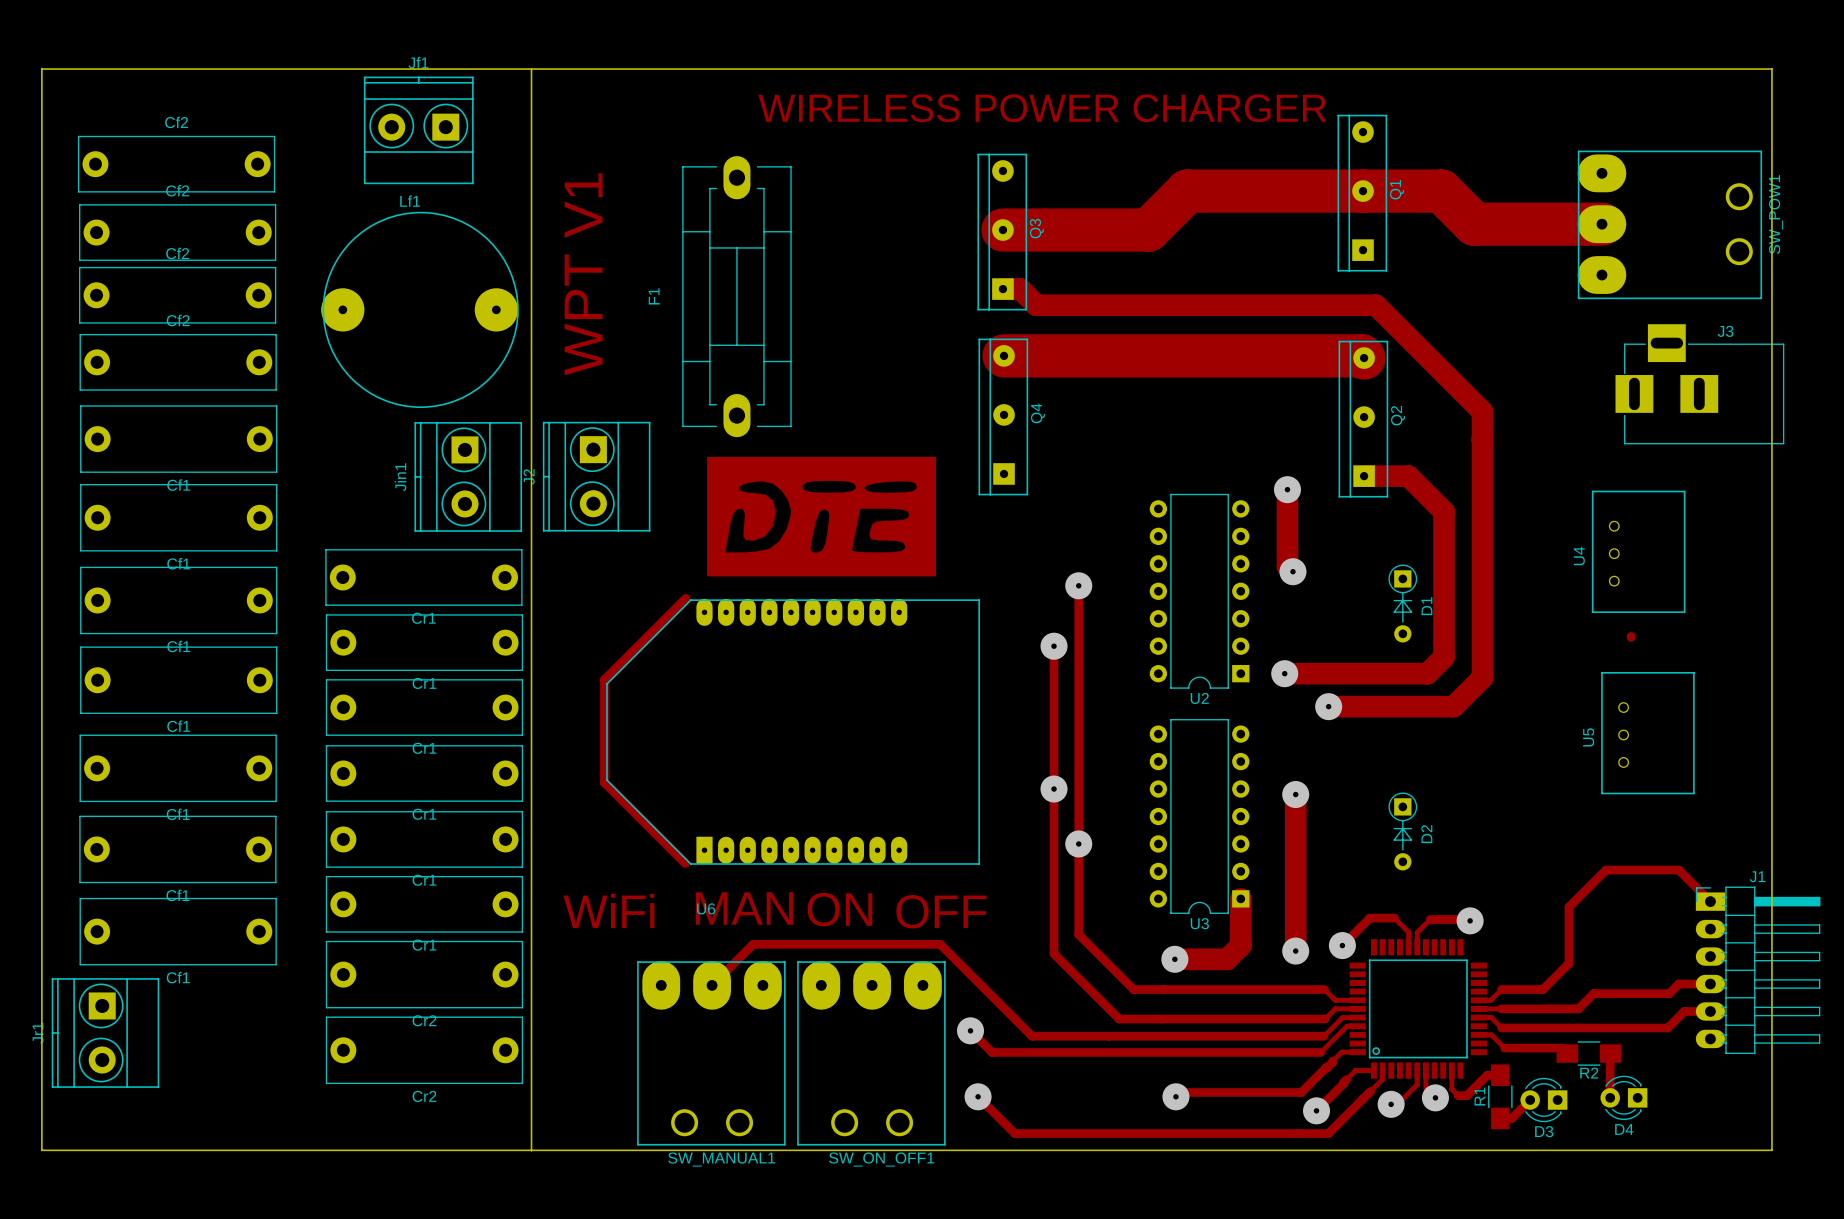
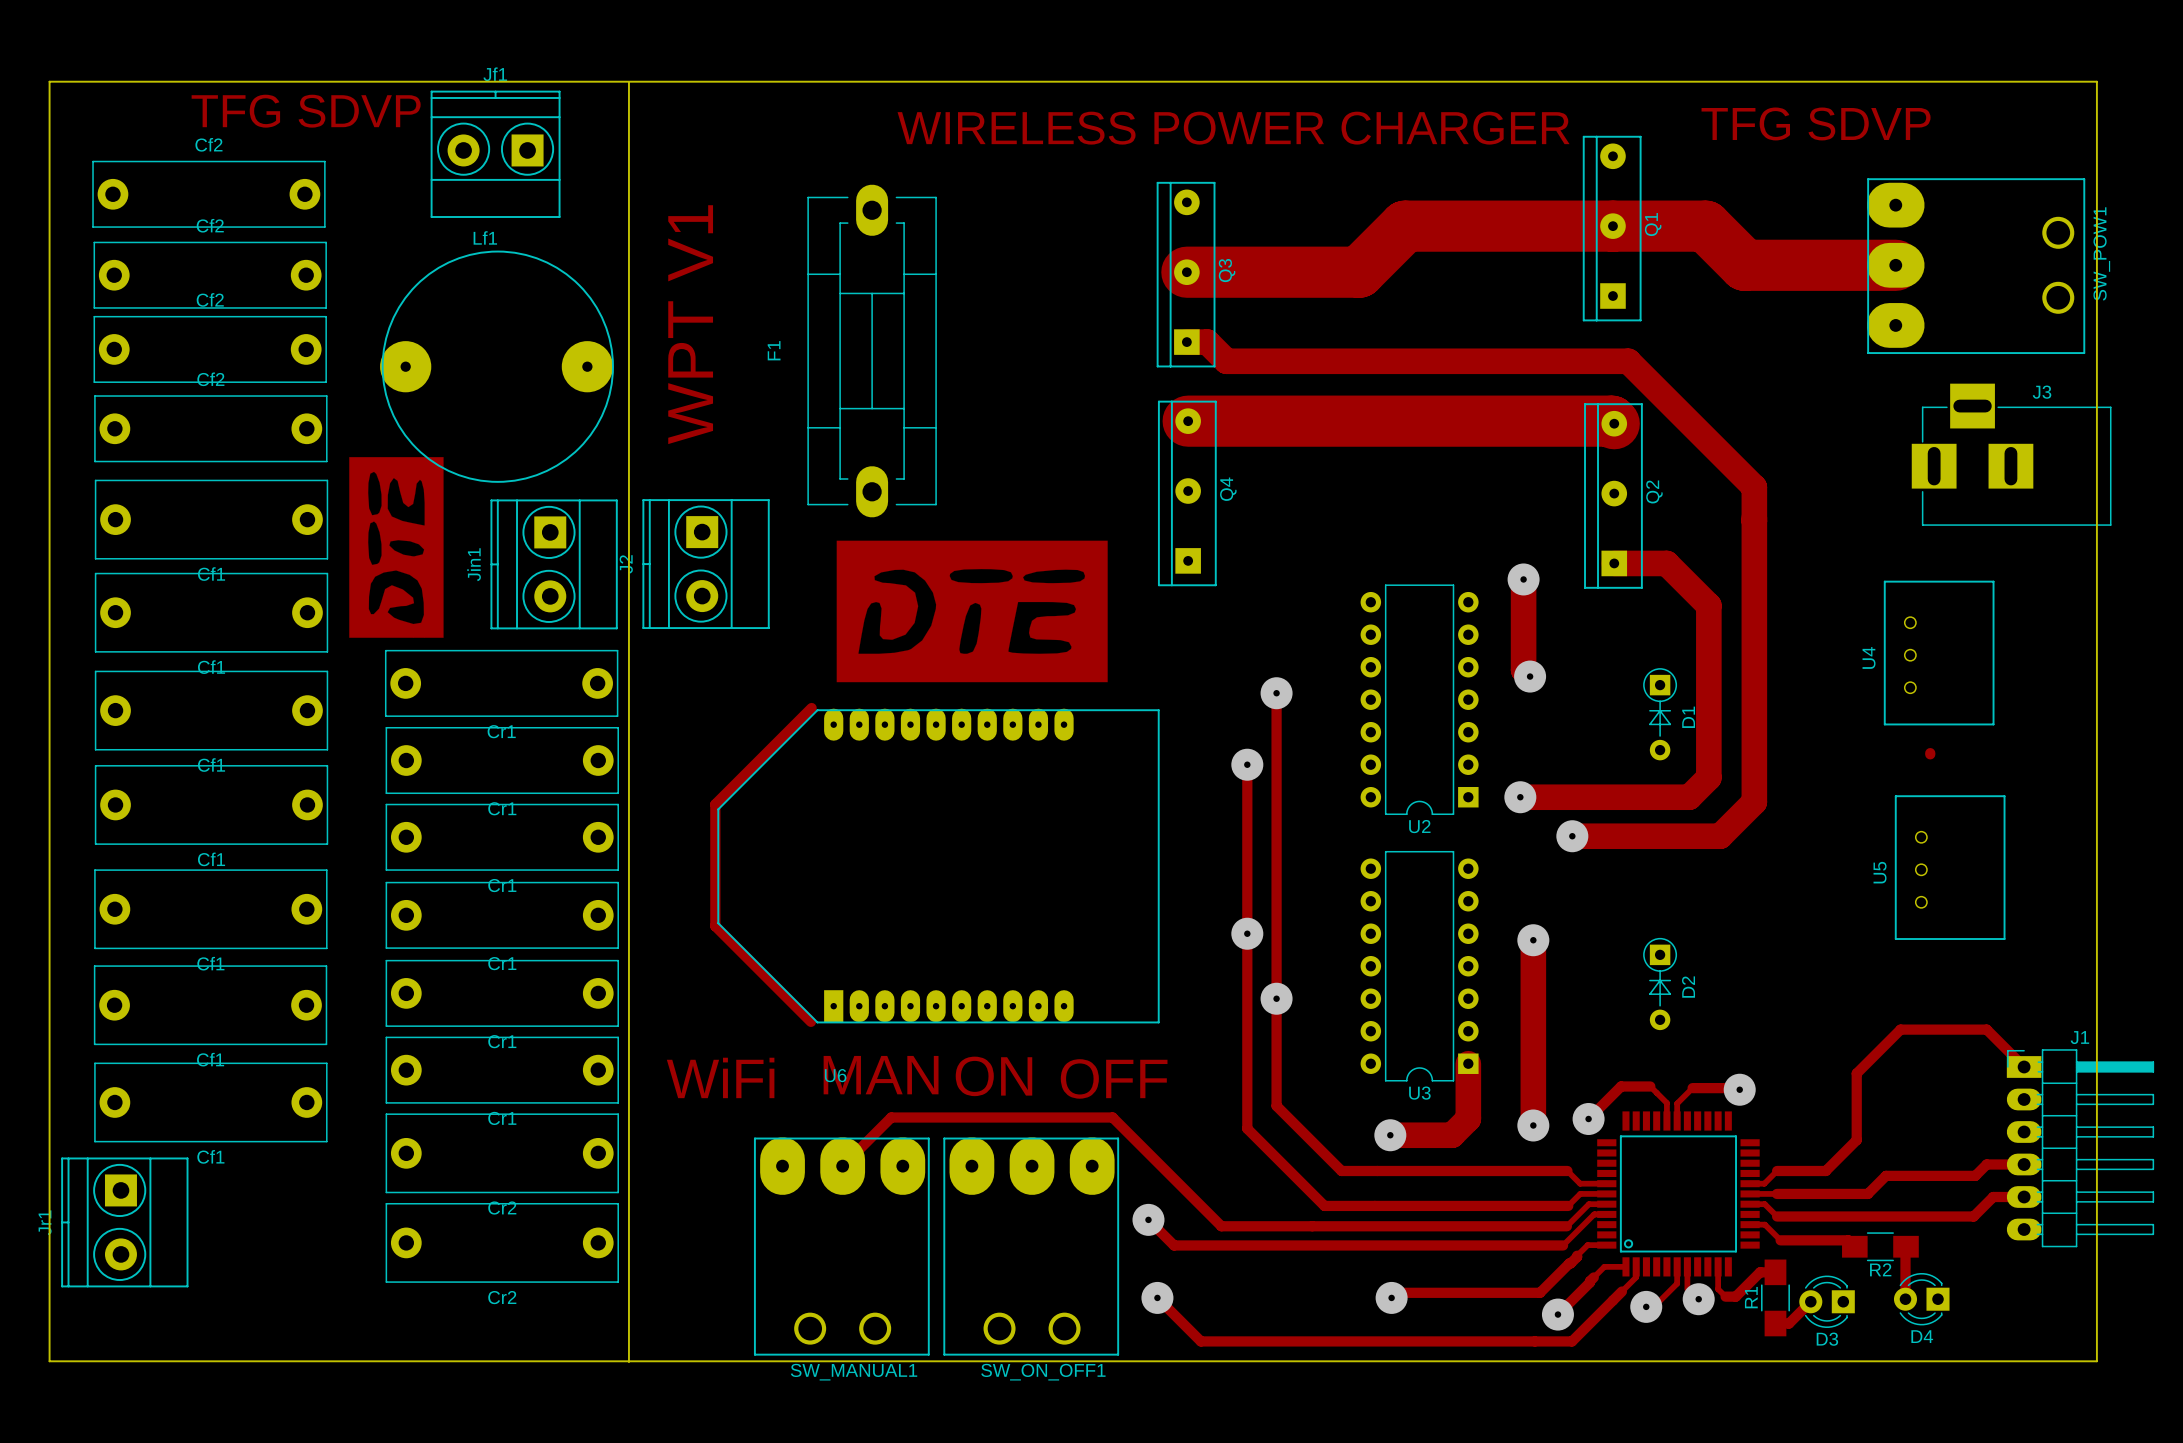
text: none -> TFG SDVP (306, 111)
text: none -> TFG SDVP (1816, 123)
drawing: none -> [349, 457, 444, 638]

